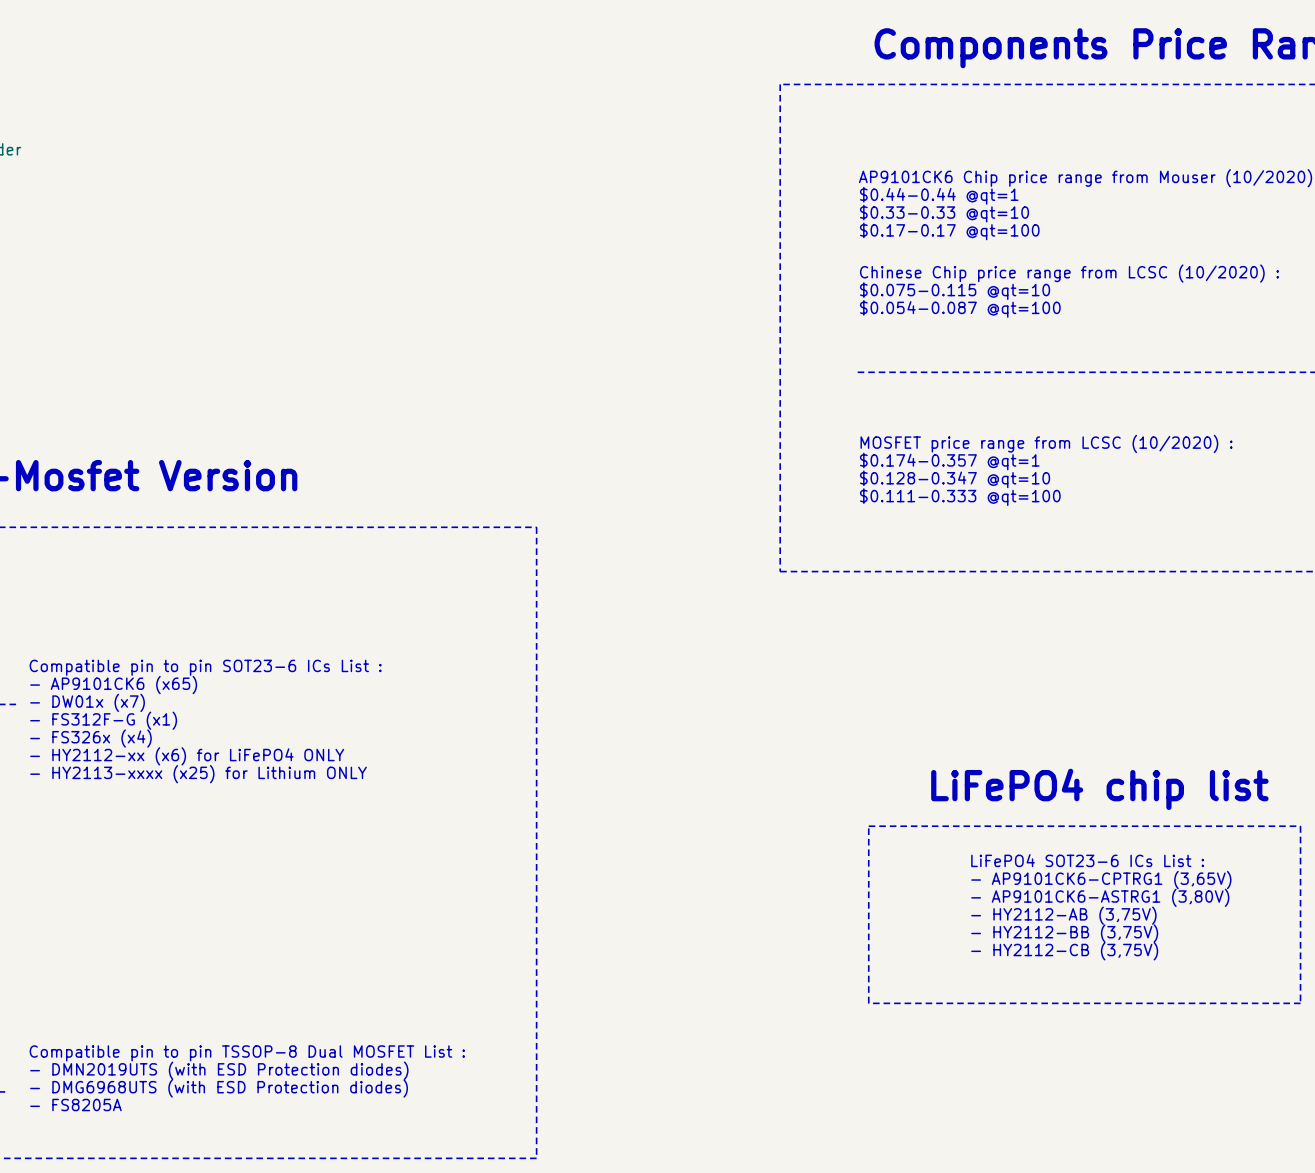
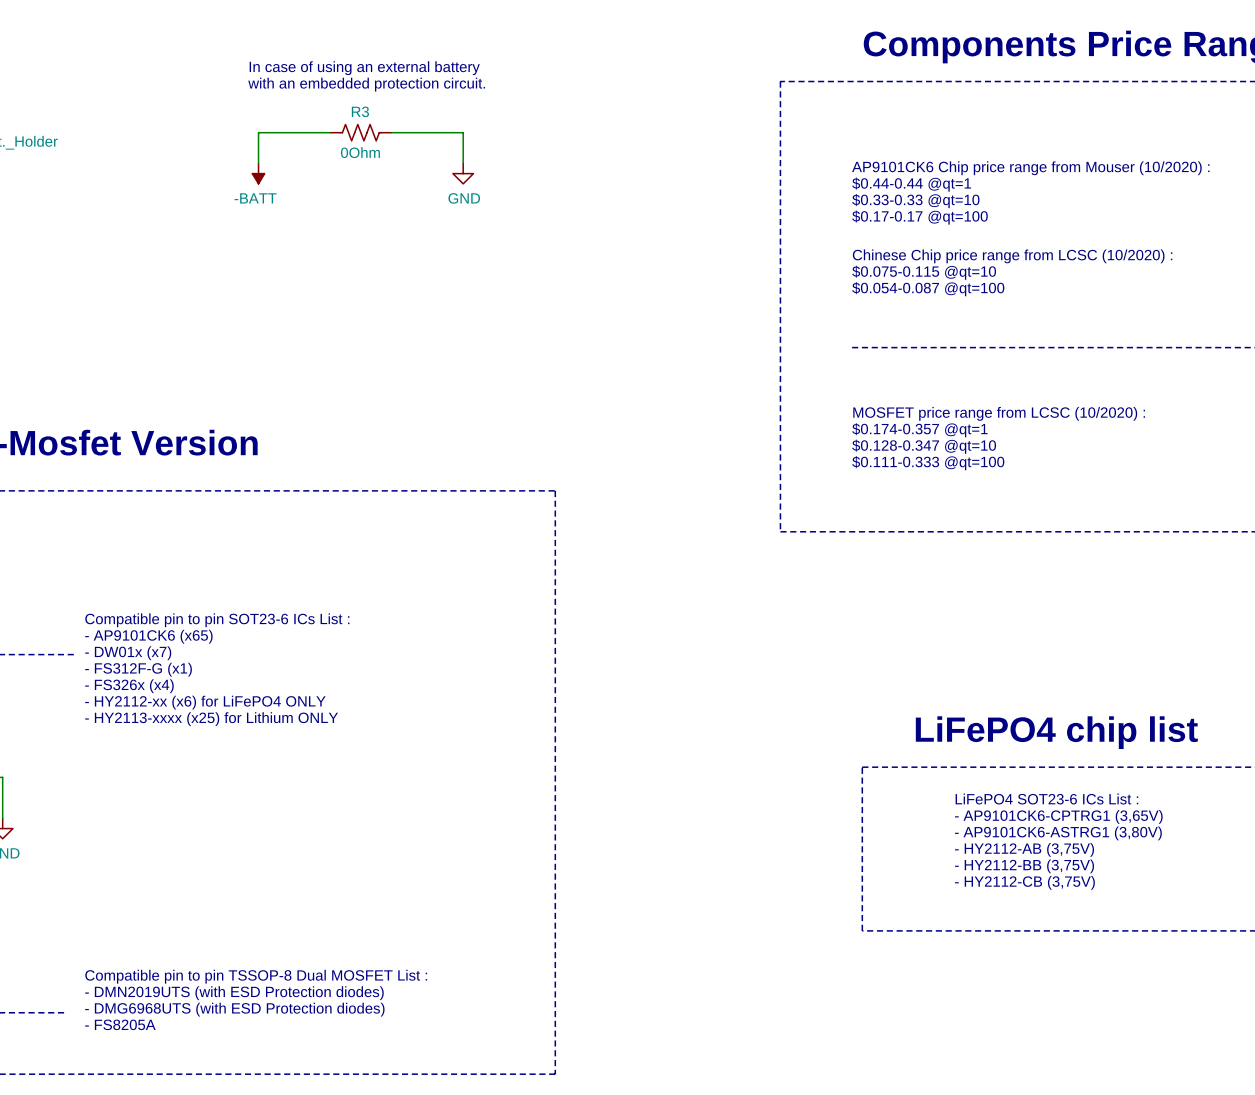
text: none -> In case of using an external battery (364, 68)
text: none -> with an embedded protection circuit. (366, 84)
wire: none -> (330, 132) (258, 132) (258, 163)
R3: none -> 0Ohm (360, 132)
wire: none -> (391, 132) (463, 132) (463, 163)
power symbol: none -> -BATT (258, 173)
power symbol: none -> GND (463, 173)

